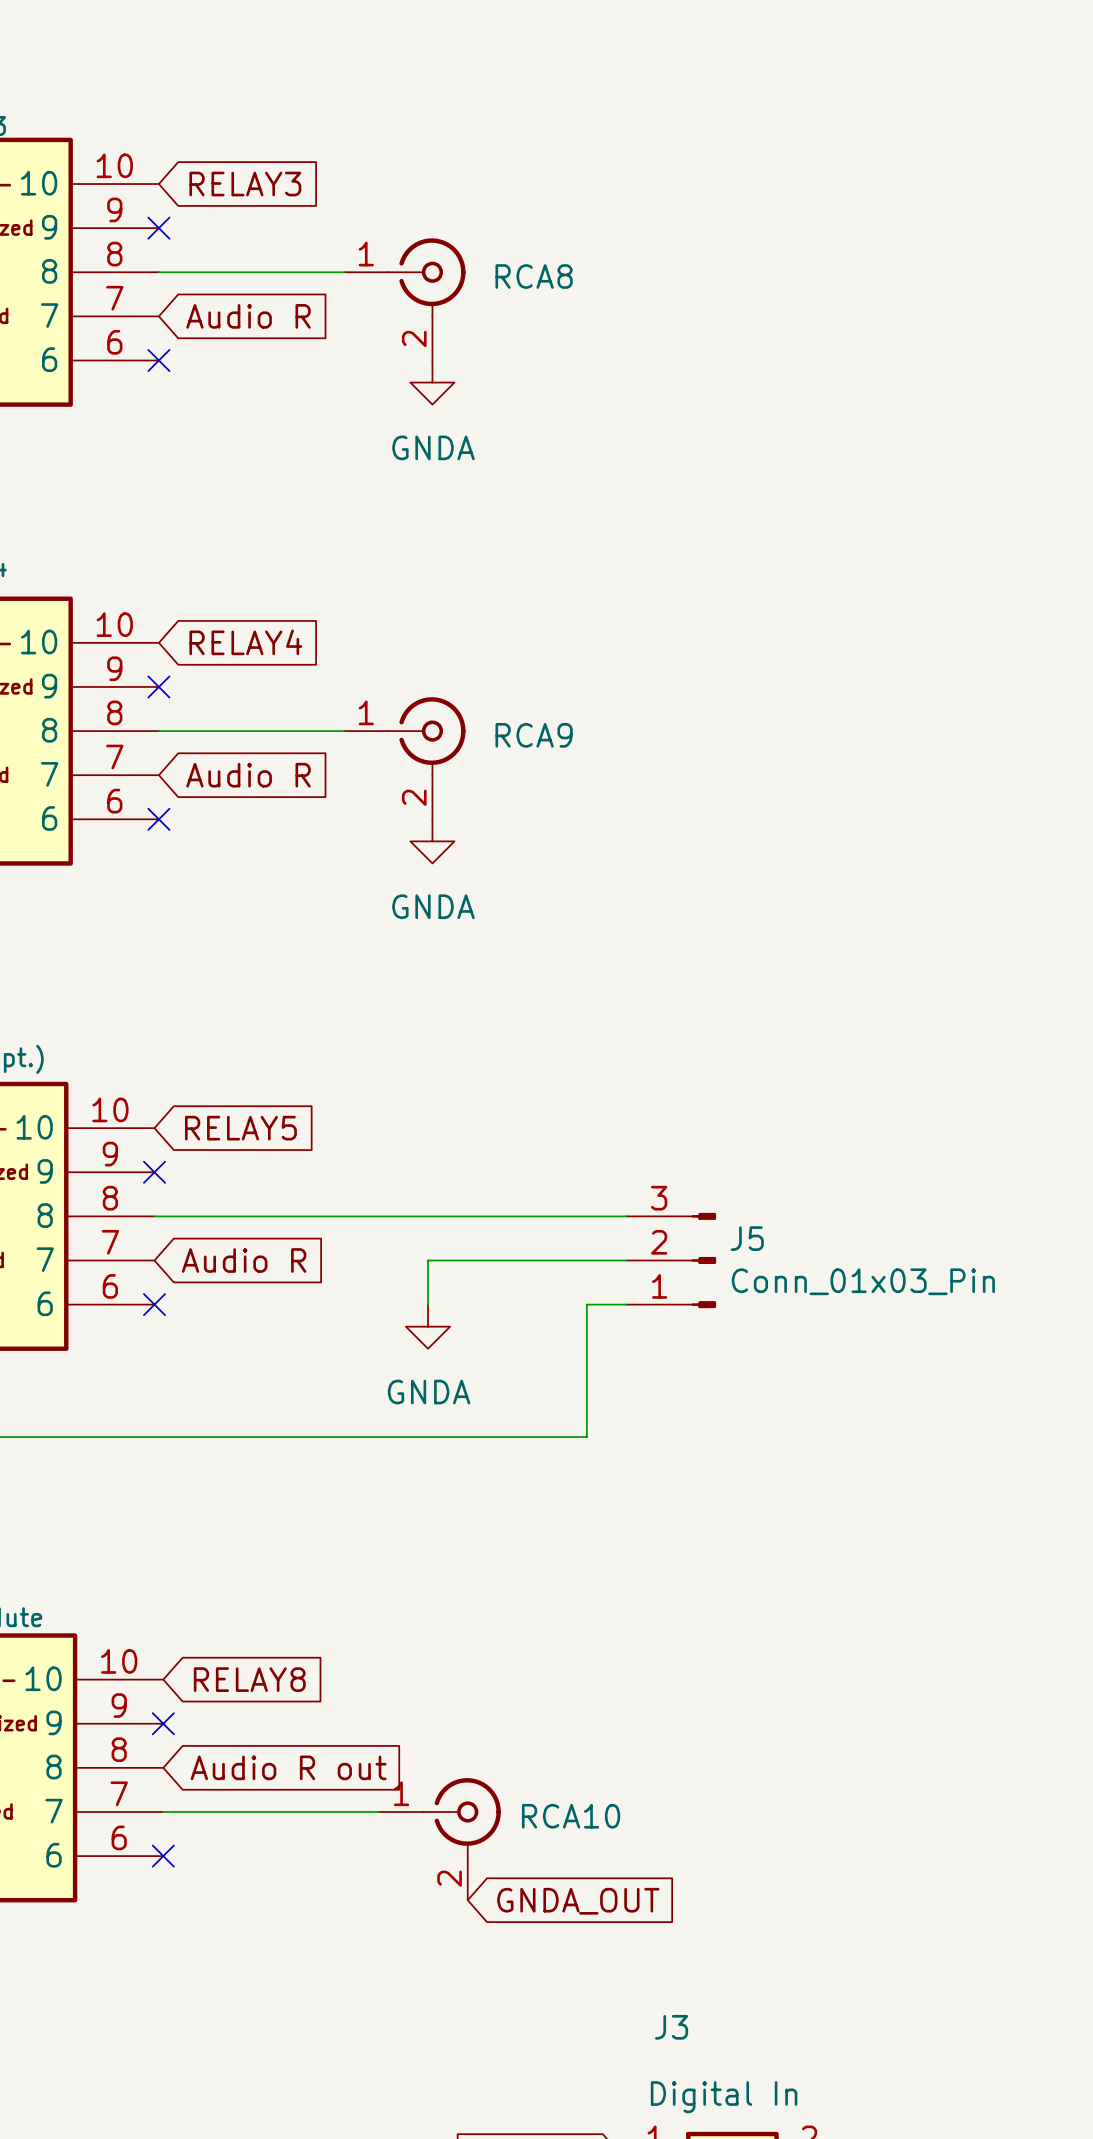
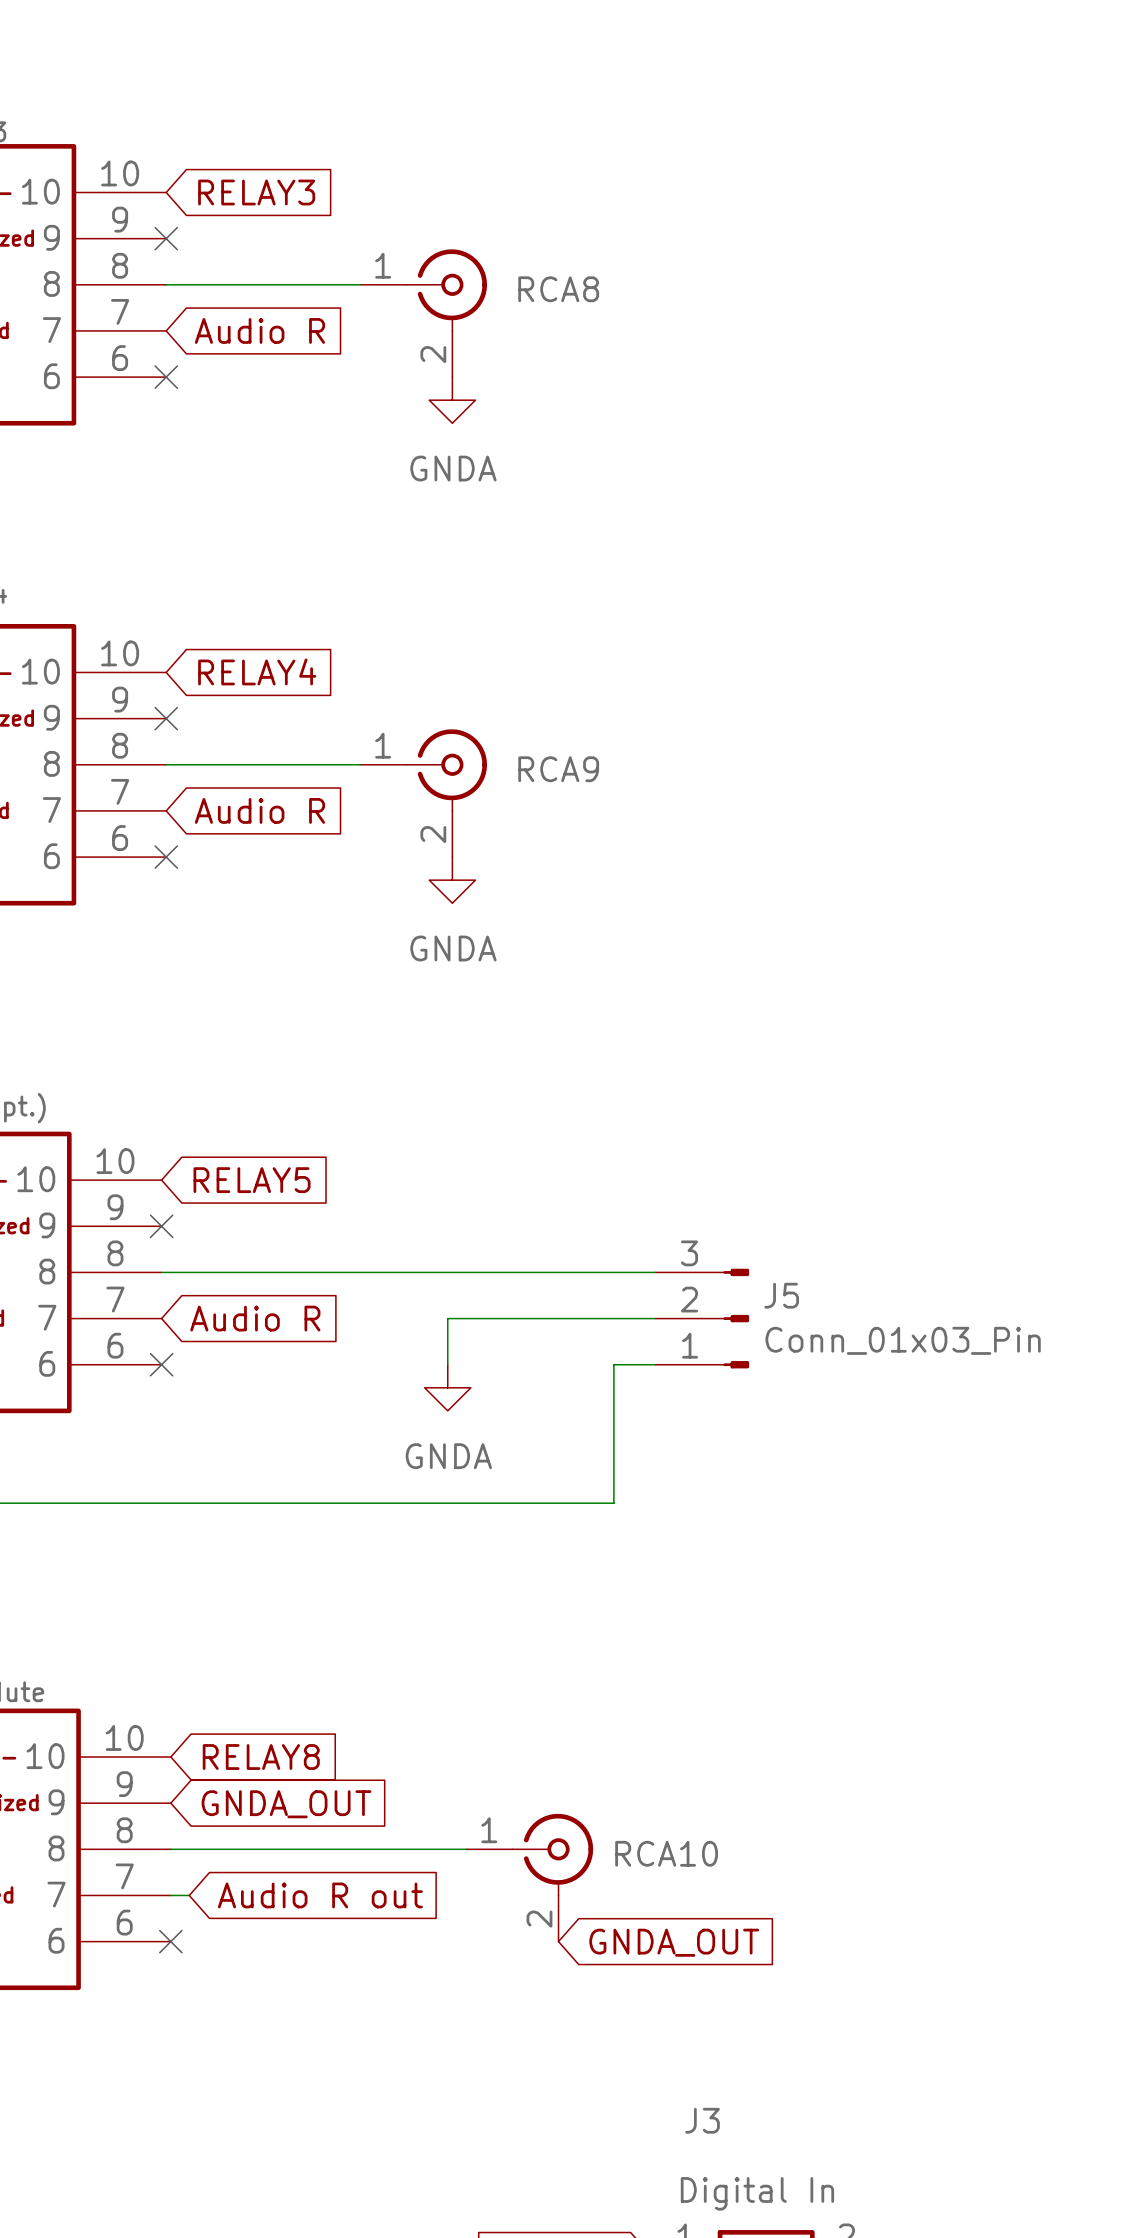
no-connect mark: (163, 1723) -> none
global label: none -> GNDA_OUT (286, 1804)
wire: none -> (170, 1849) (466, 1849)
global label position: Audio R out (288, 1767) -> Audio R out (320, 1895)
wire: (180, 1811) (379, 1811) -> none
RCA10 position: (440, 1839) -> (529, 1877)
global label position: GNDA_OUT (578, 1901) -> GNDA_OUT (674, 1942)

